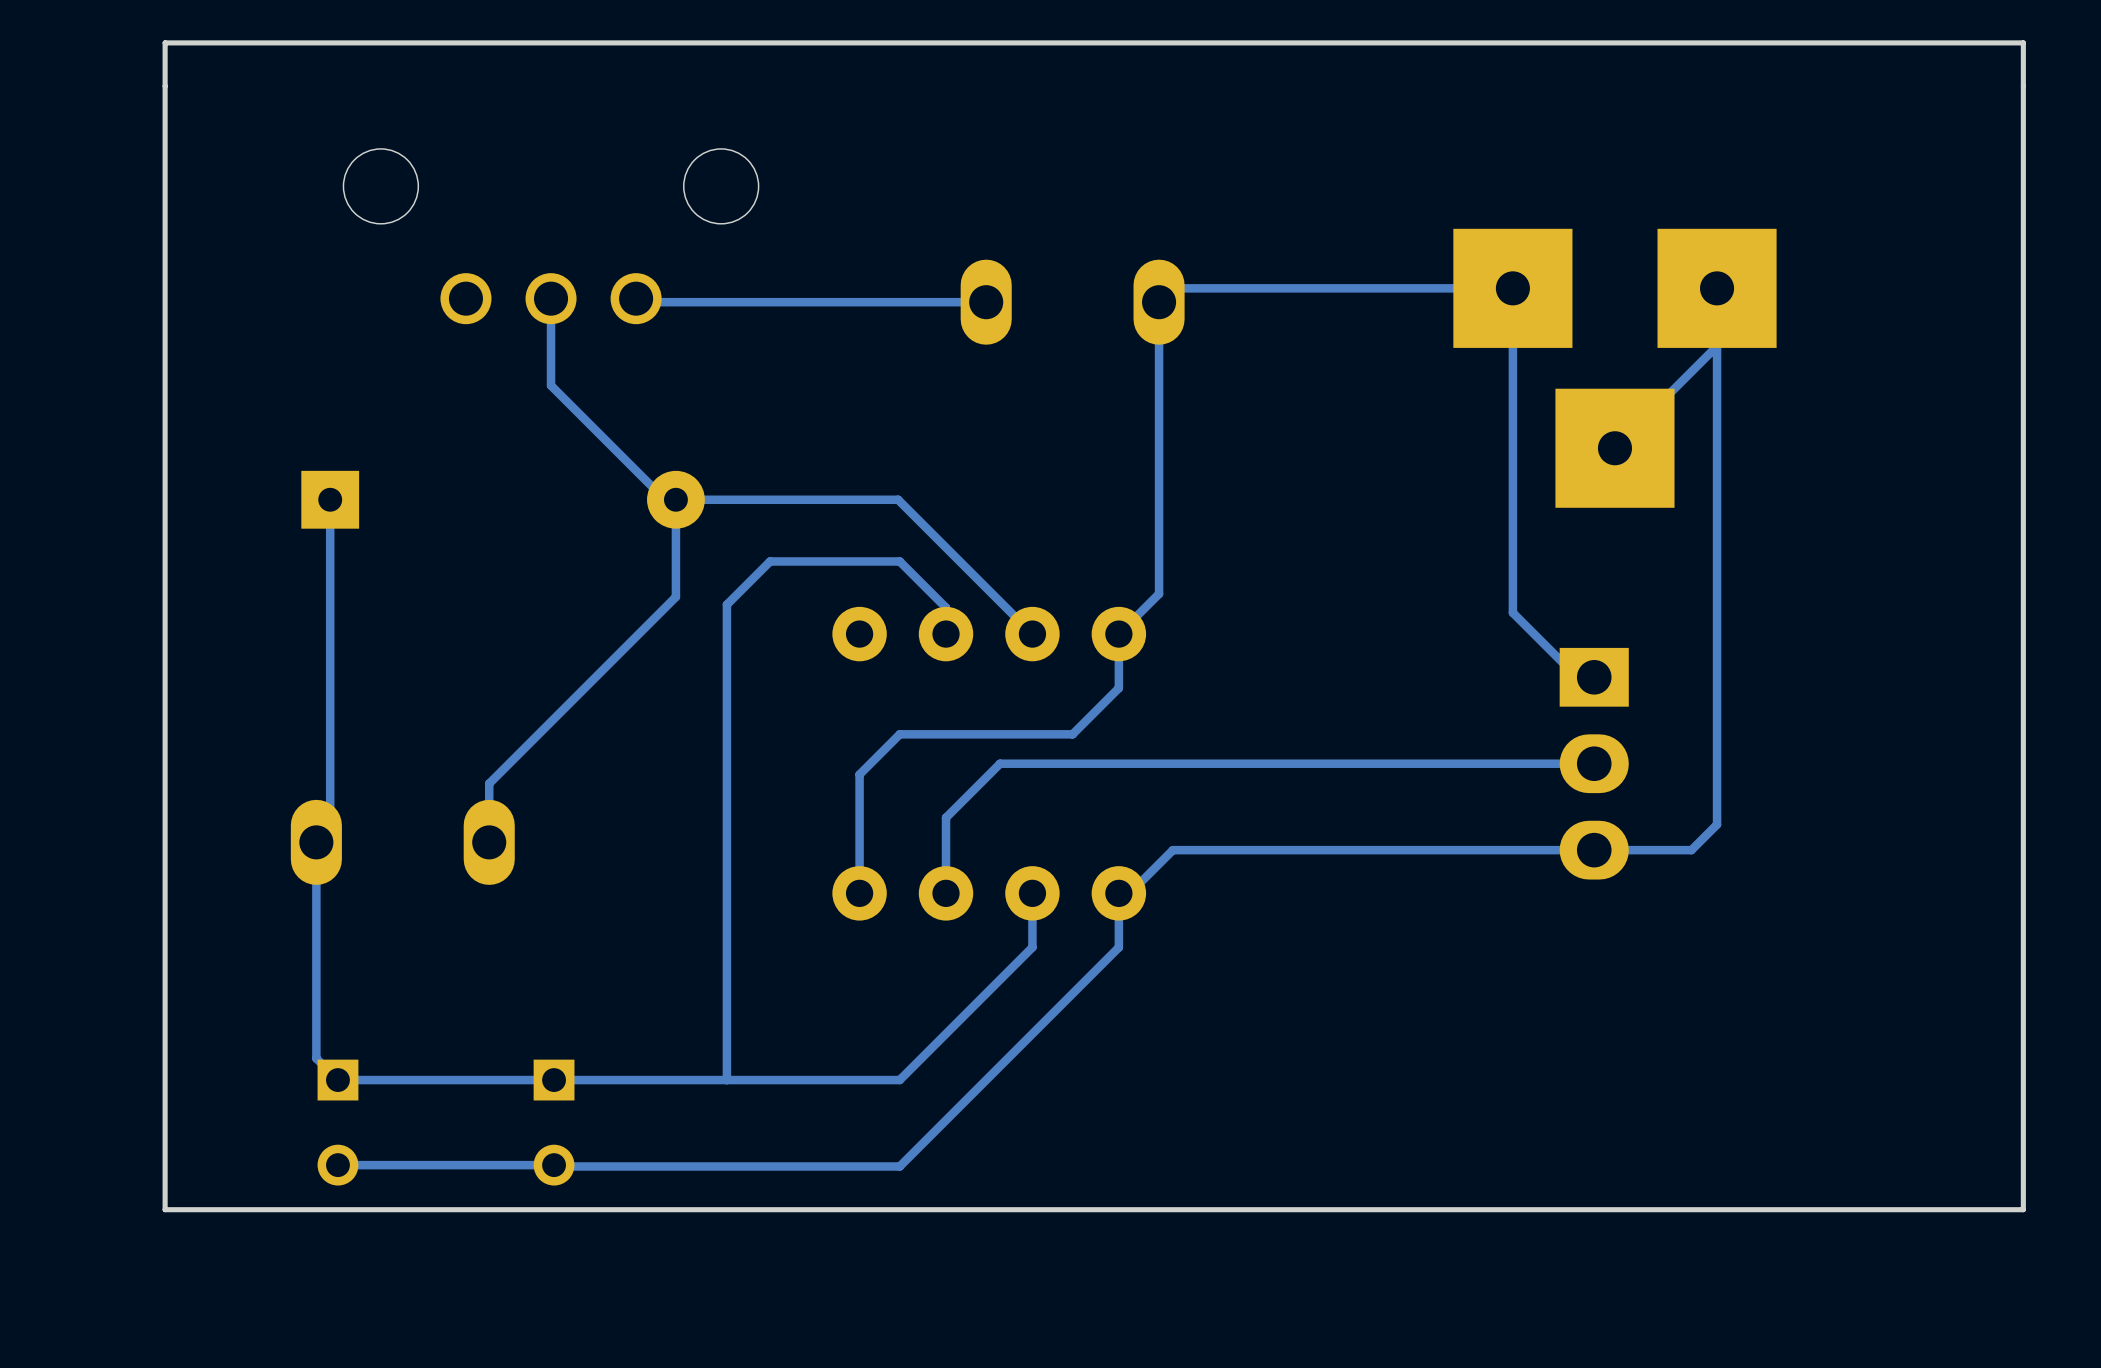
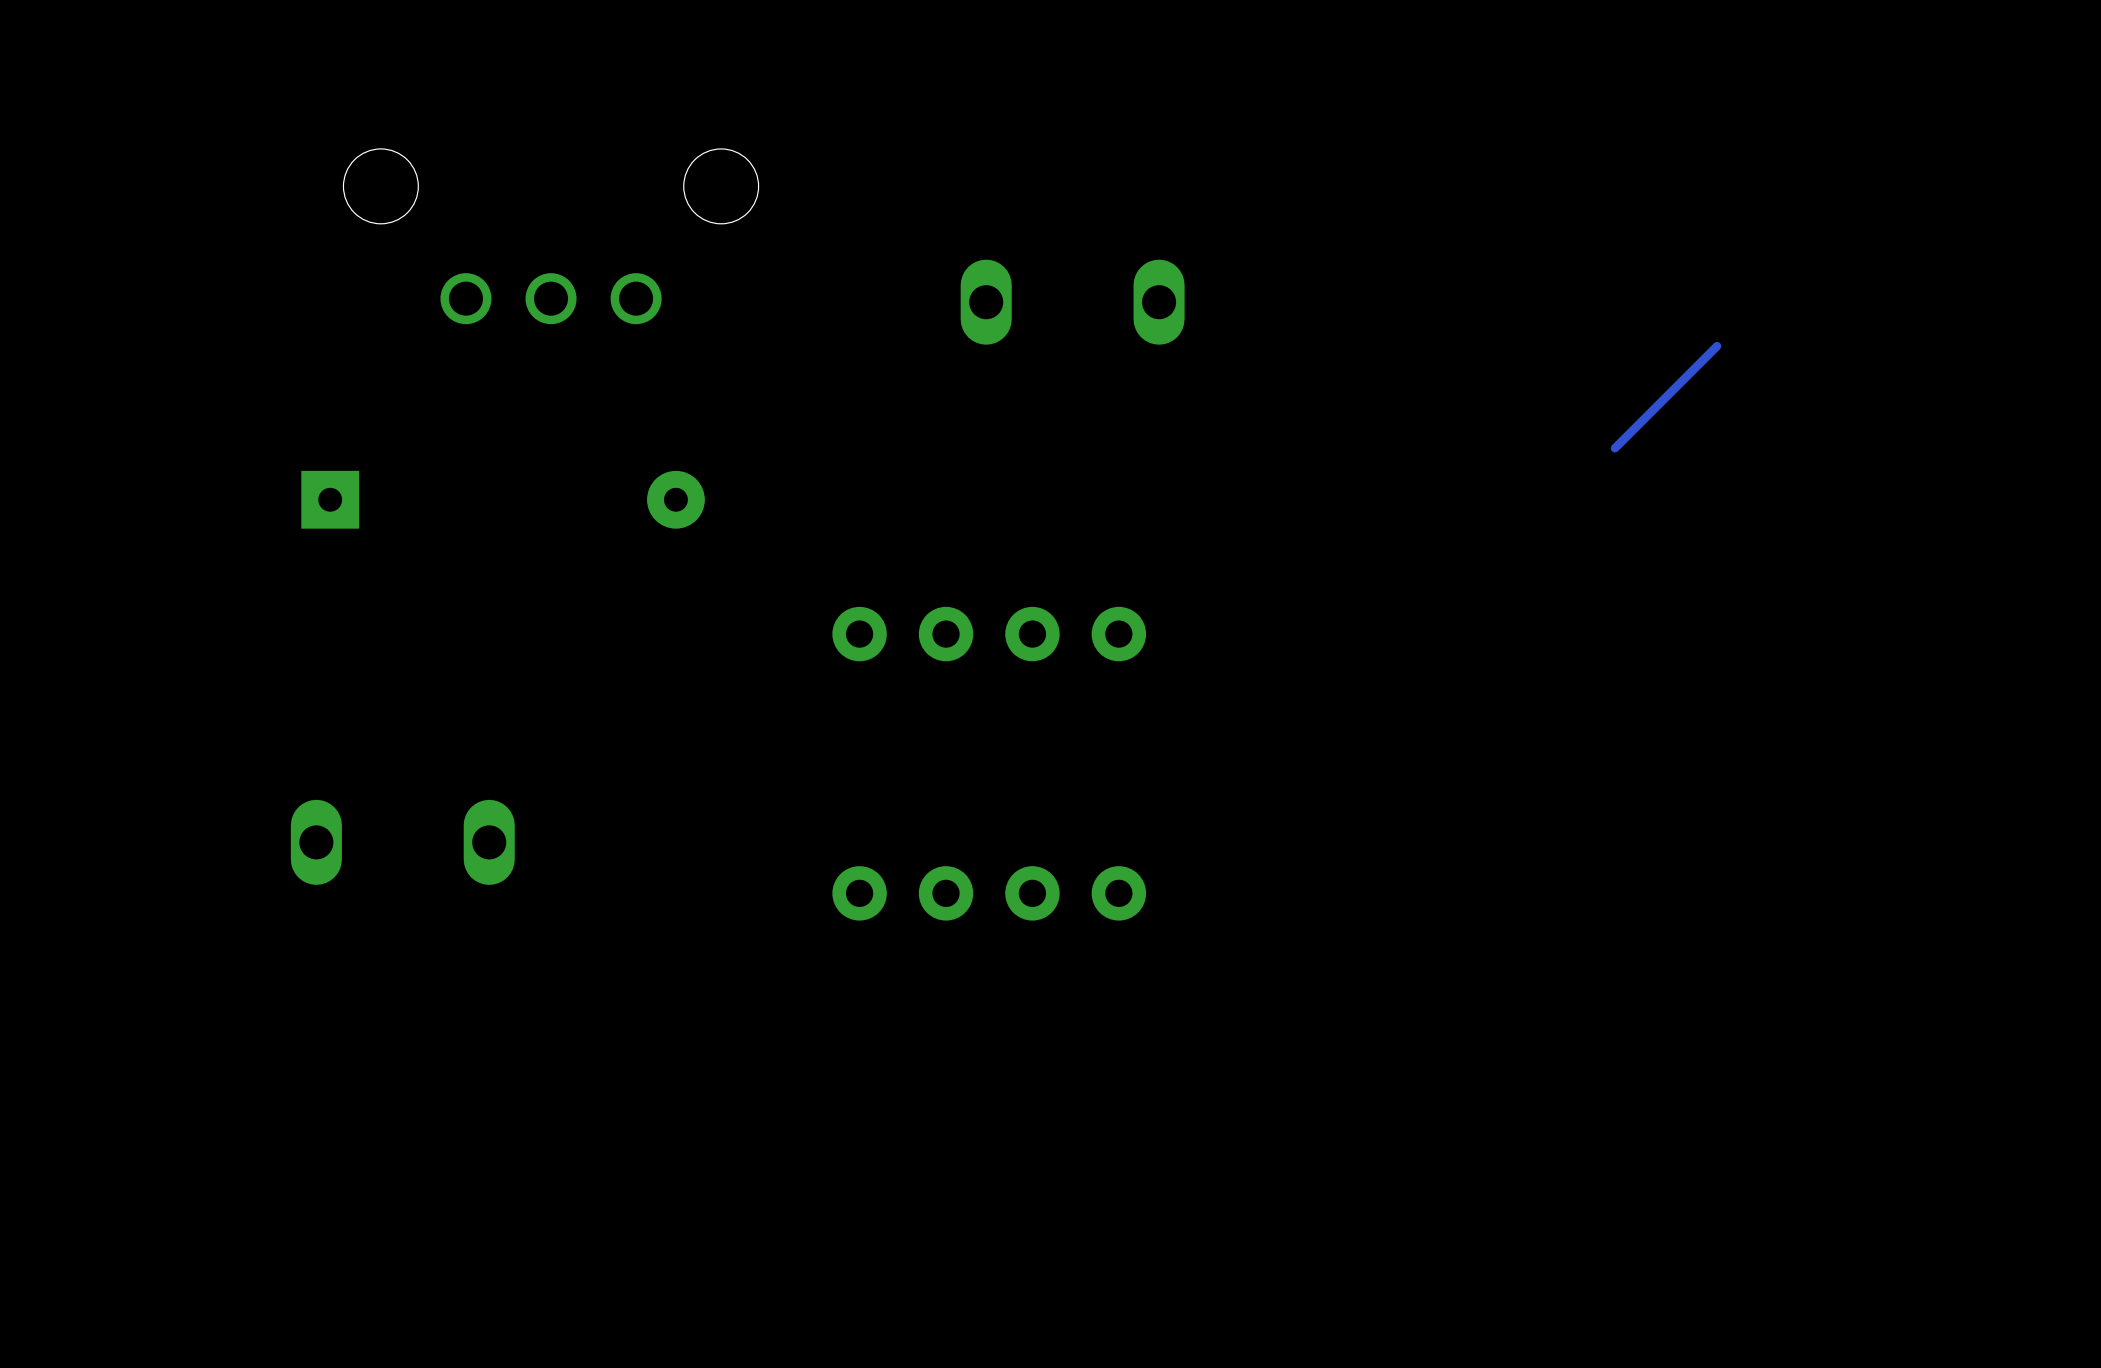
board edge: (2023, 42) (2023, 1209) (165, 1209) (165, 42) (2023, 42) -> none
track: (1717, 288) (1717, 824) (1691, 850) (1172, 850) (1129, 893) (1118, 893) (1118, 947) (899, 1166) (337, 1165) -> none
track: (551, 298) (551, 385) (665, 499) (898, 499) (1032, 634) -> none
track: (636, 298) (639, 302) (986, 302) -> none
part: (1614, 368) -> none
track: (330, 499) (330, 828) (316, 842) (316, 1058) (337, 1080) (899, 1080) (1032, 947) (1032, 893) -> none
track: (675, 499) (675, 596) (489, 783) (489, 842) -> none
track: (946, 634) (946, 607) (899, 561) (770, 561) (726, 604) (726, 1080) -> none
track: (1594, 677) (1577, 677) (1512, 612) (1512, 288) (1172, 288) (1159, 302) (1159, 593) (1118, 634) (1118, 688) (1072, 734) (899, 734) (859, 774) (859, 893) -> none
track: (1594, 763) (1000, 763) (946, 817) (946, 893) -> none
part: (1594, 763) -> none
part: (337, 1122) -> none
part: (554, 1122) -> none

